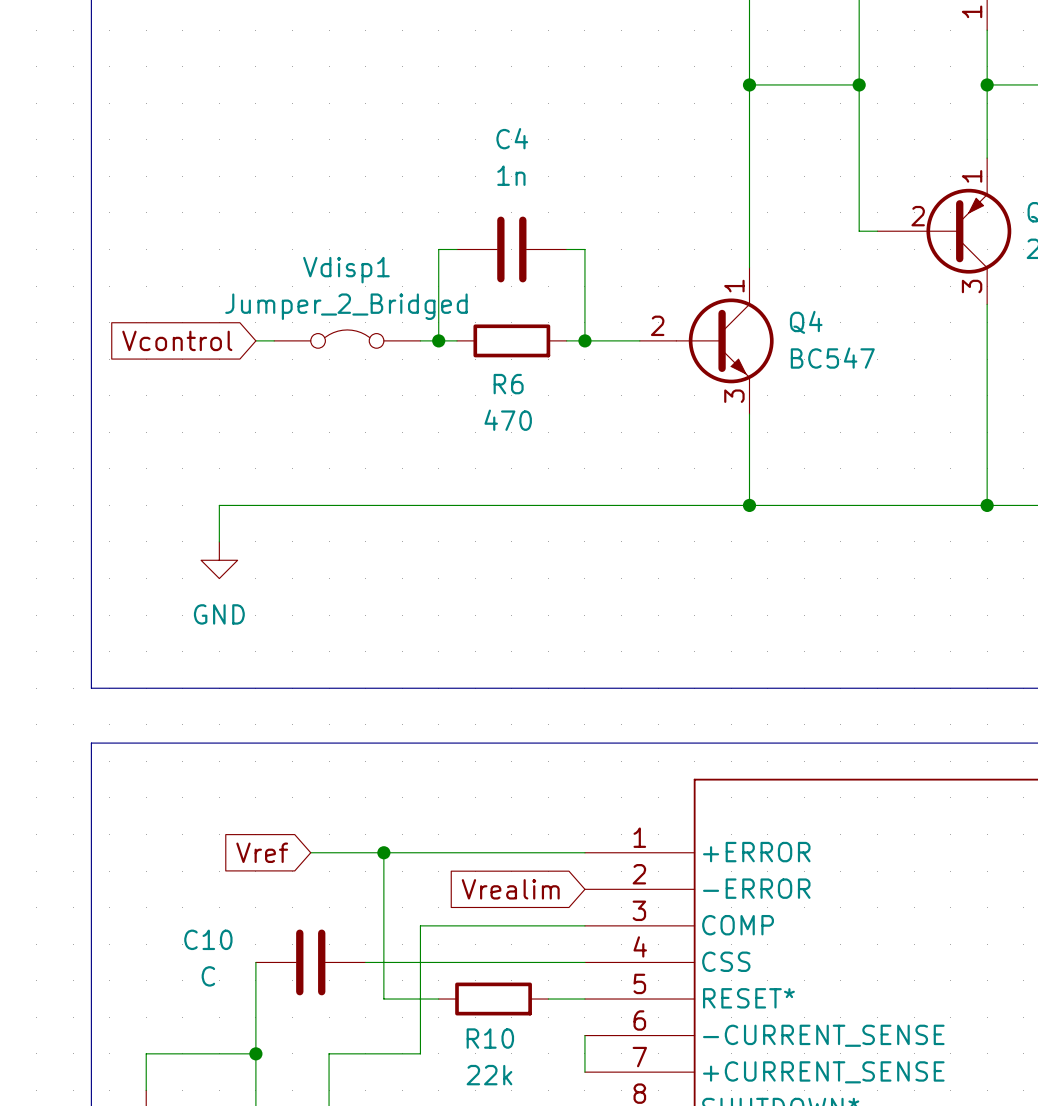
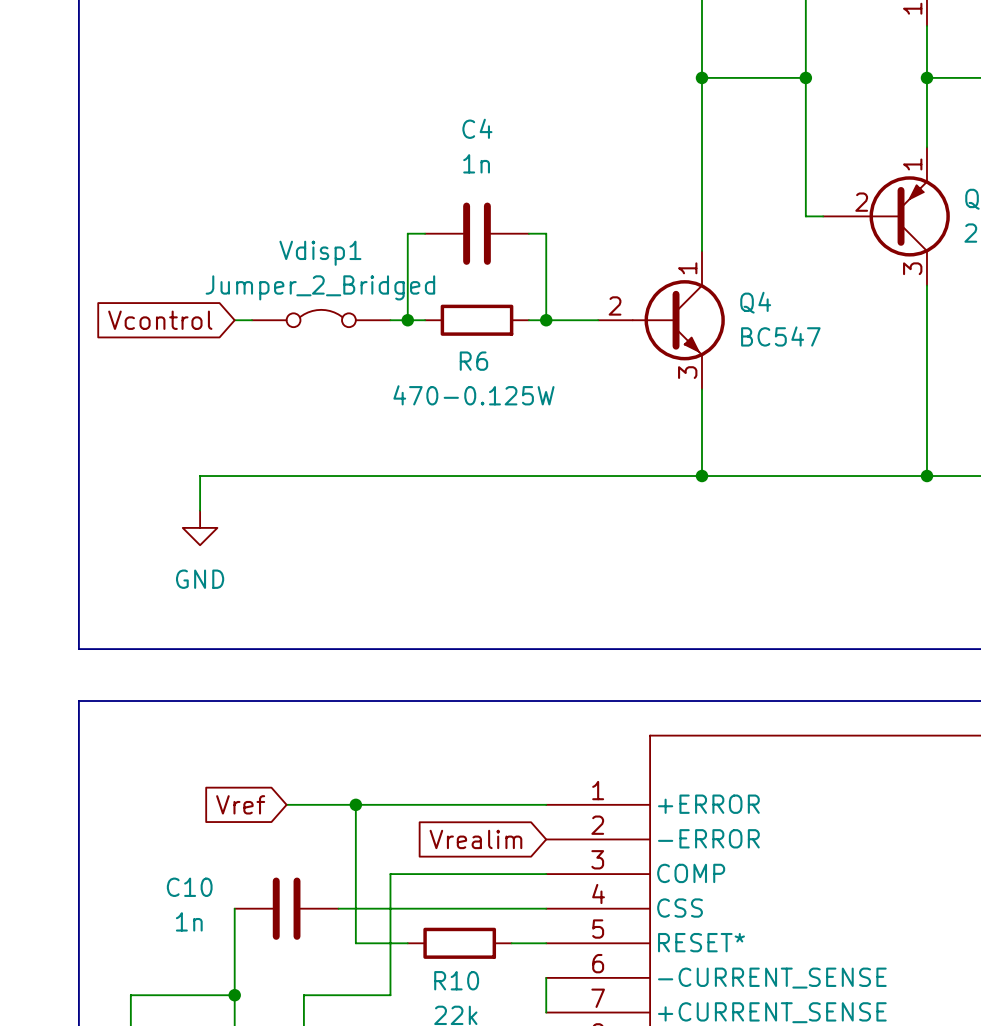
R6 value: 470 (508, 420) -> 470-0.125W (473, 395)
C10 value: C (208, 976) -> 1n (189, 921)

